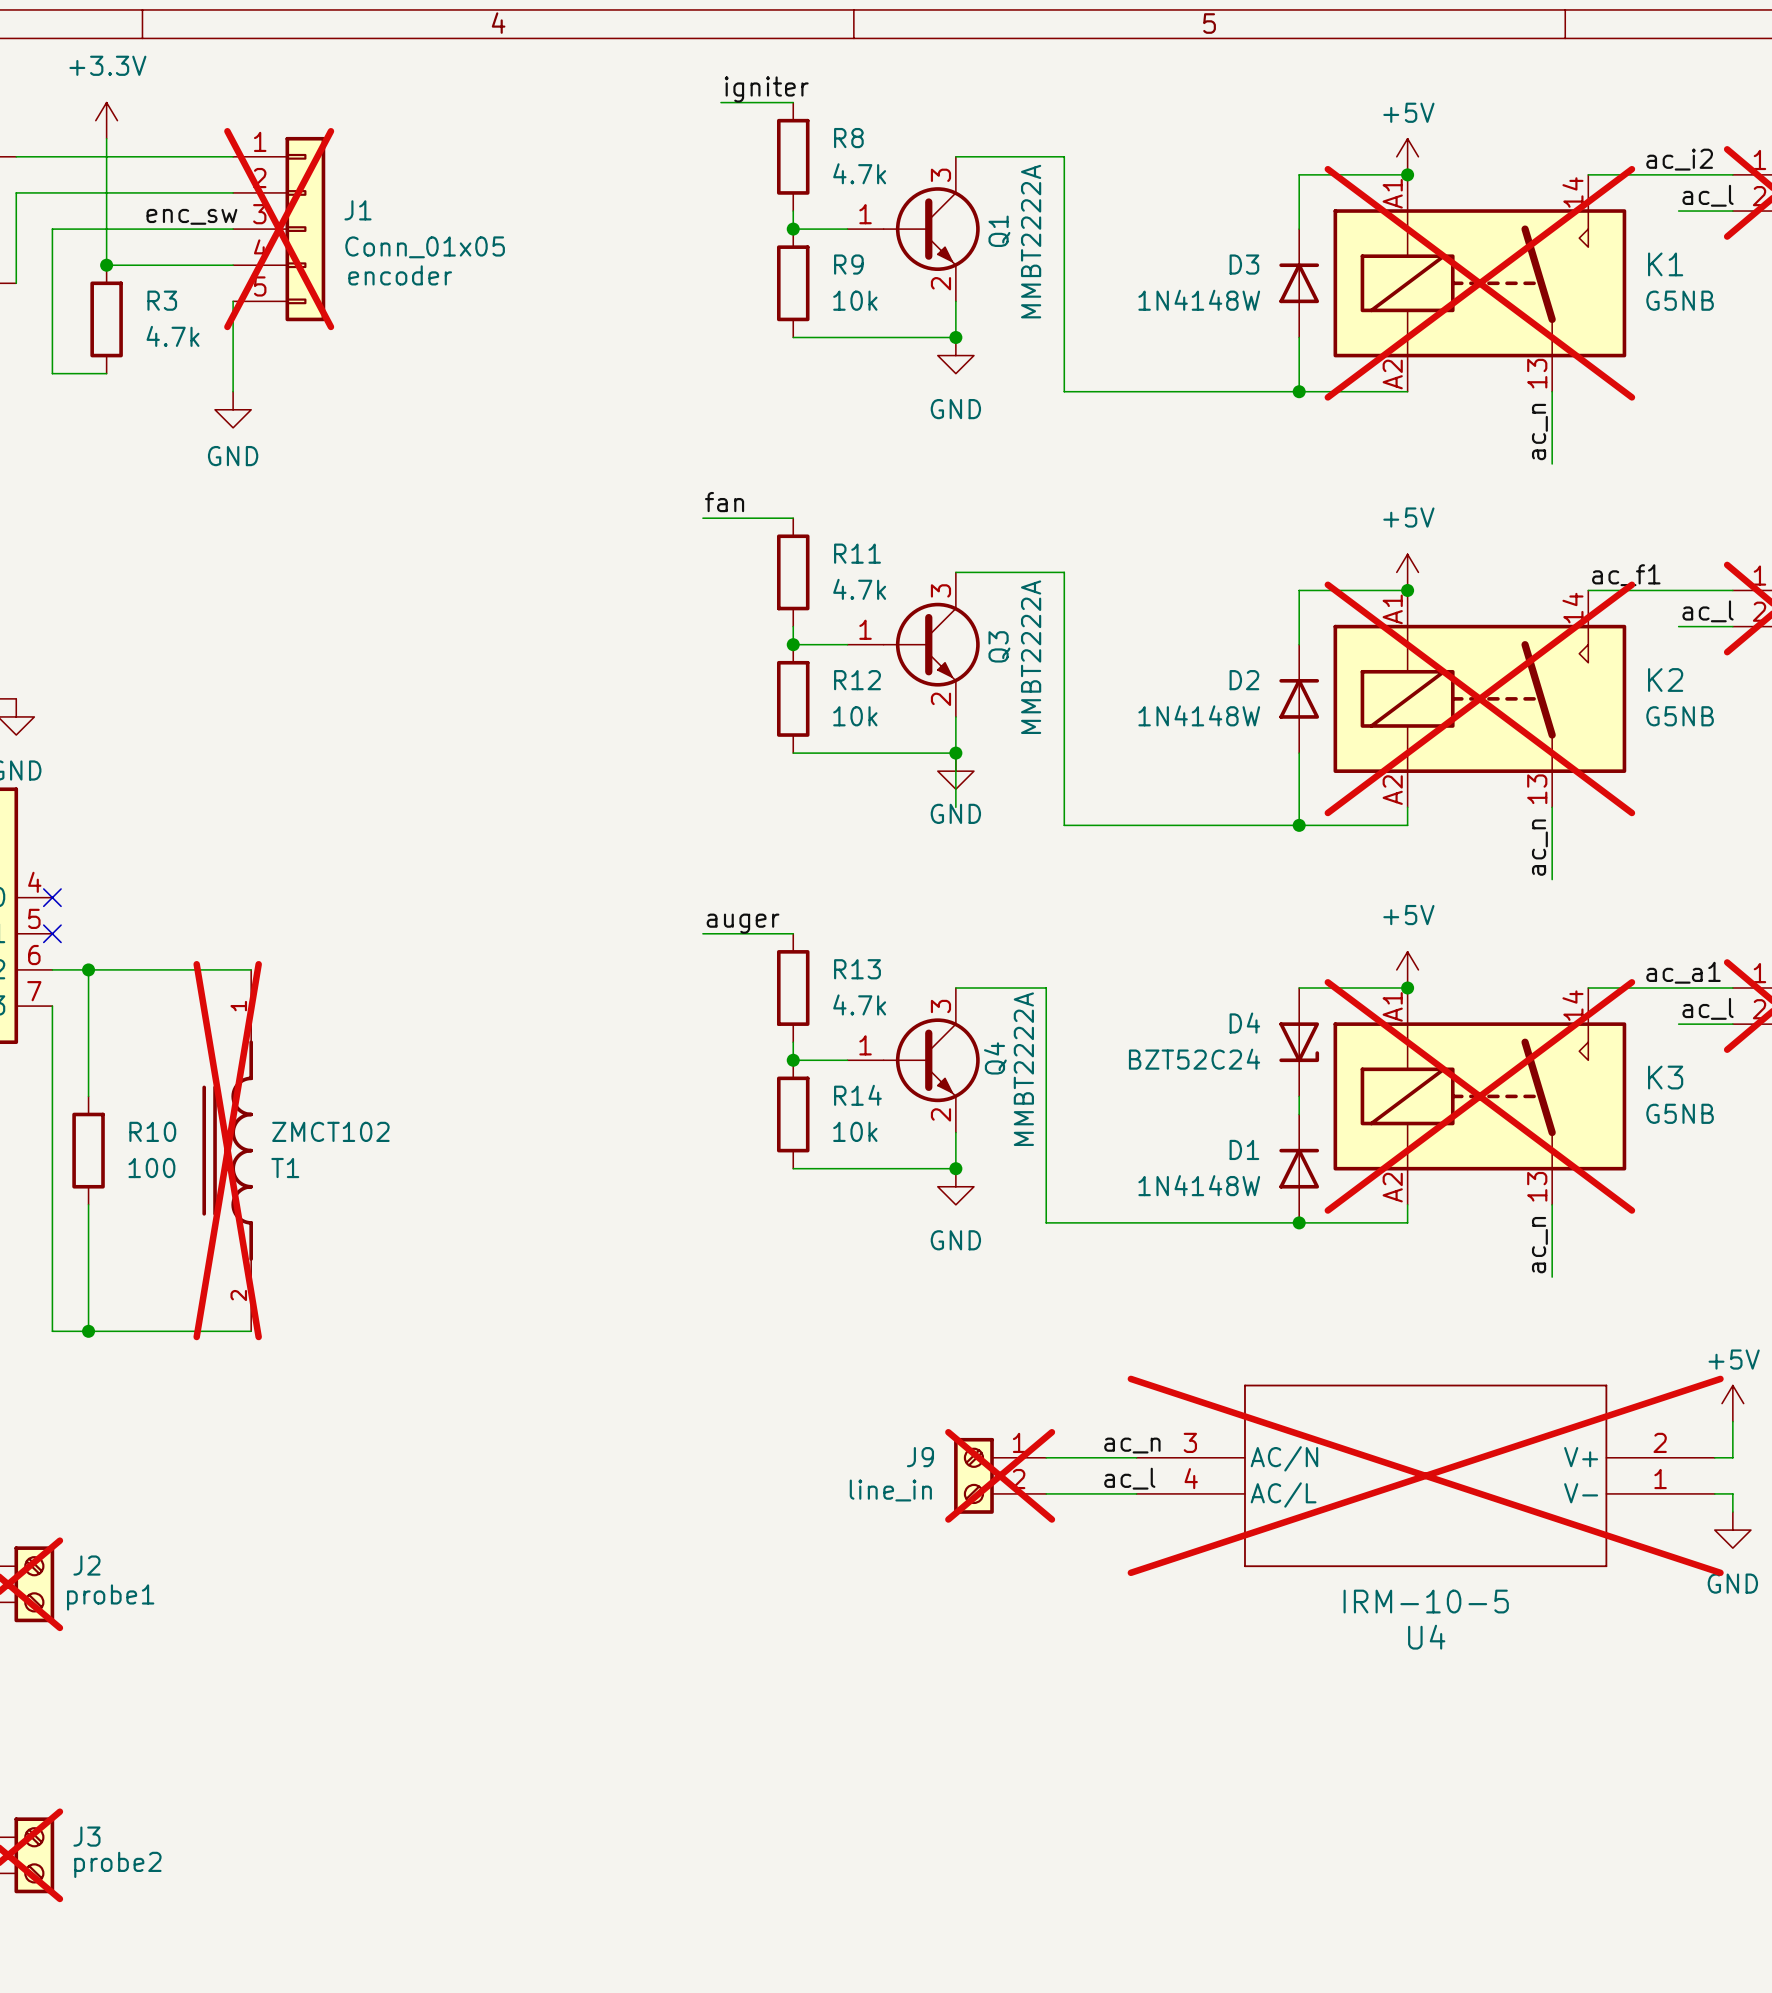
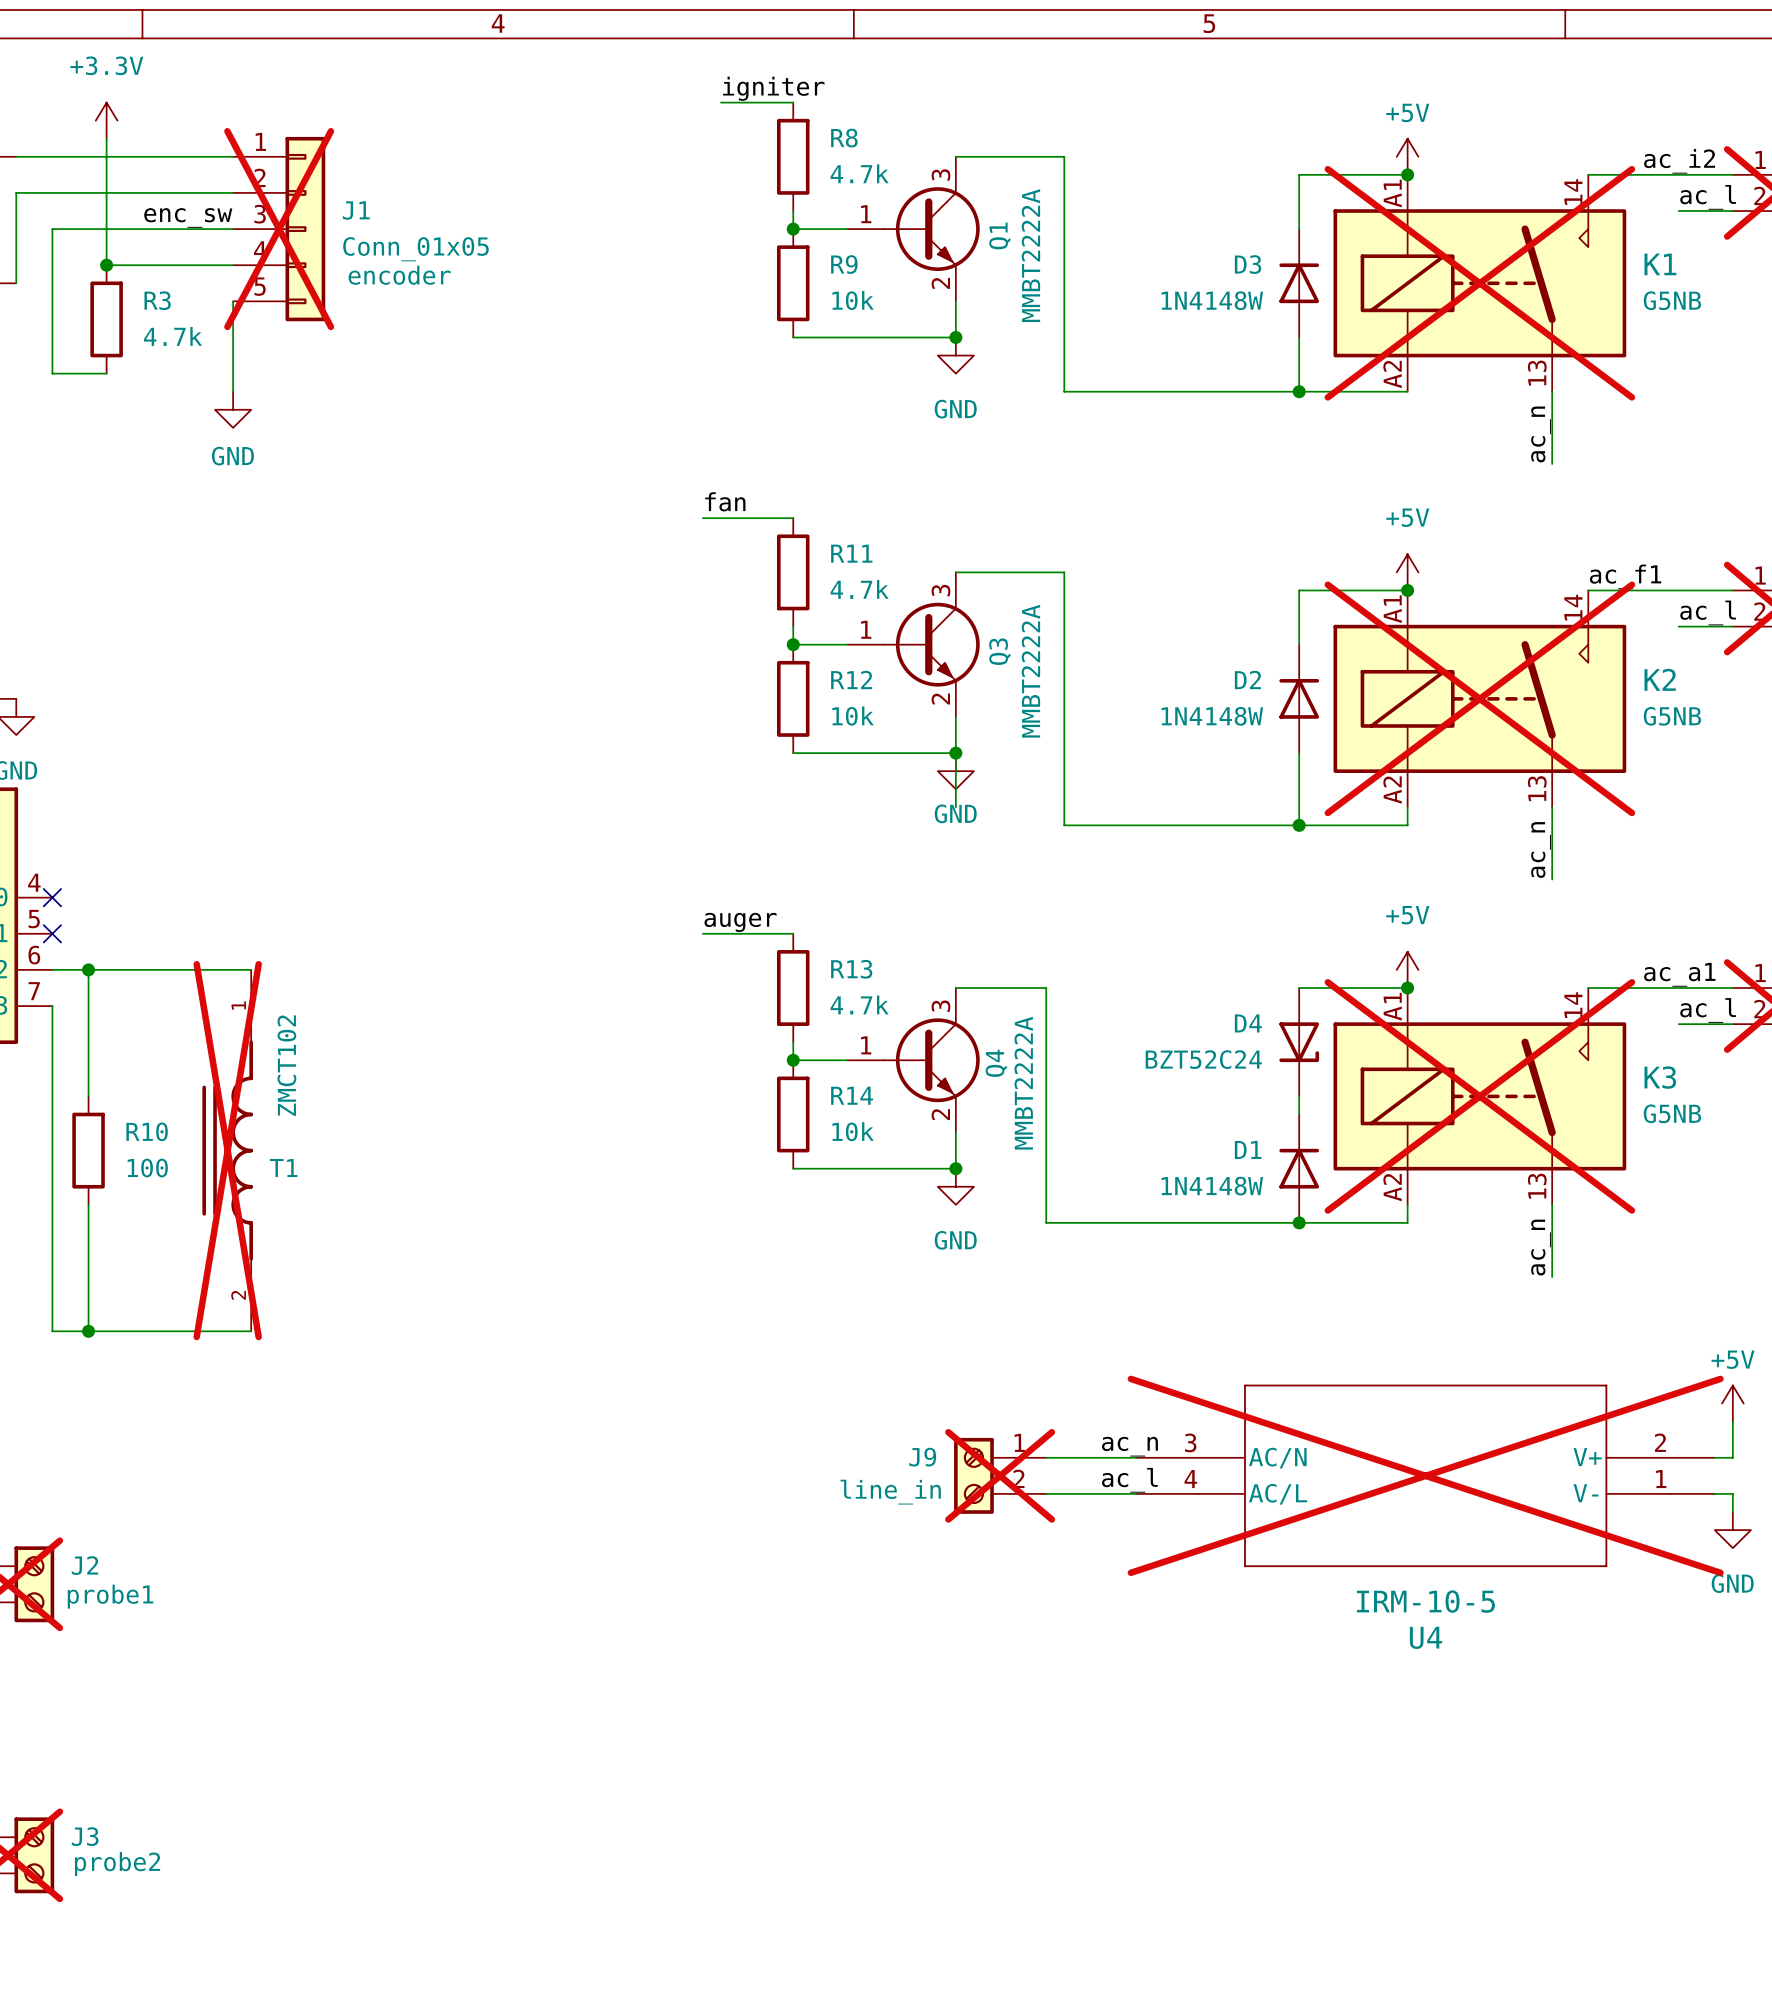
T1 value rotation: 0° (330, 1131) -> 90° counterclockwise (286, 1065)

